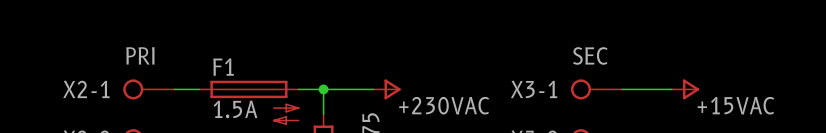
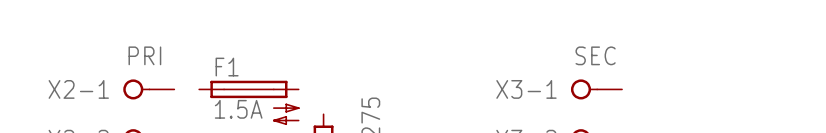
wire: (174, 89) (199, 89) -> none
wire: (298, 89) (373, 89) -> none
wire: (323, 89) (323, 114) -> none
junction: (323, 89) -> none
power symbol: +230VAC (386, 89) -> none
wire: (622, 89) (671, 89) -> none
power symbol: +15VAC (685, 89) -> none

